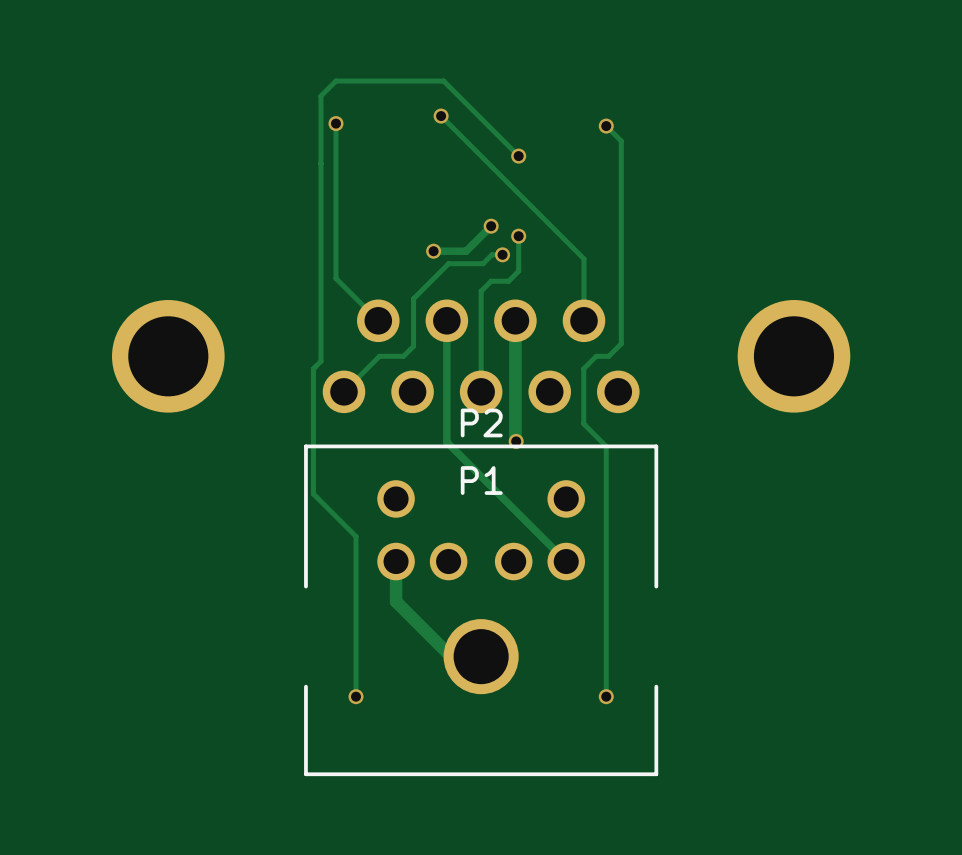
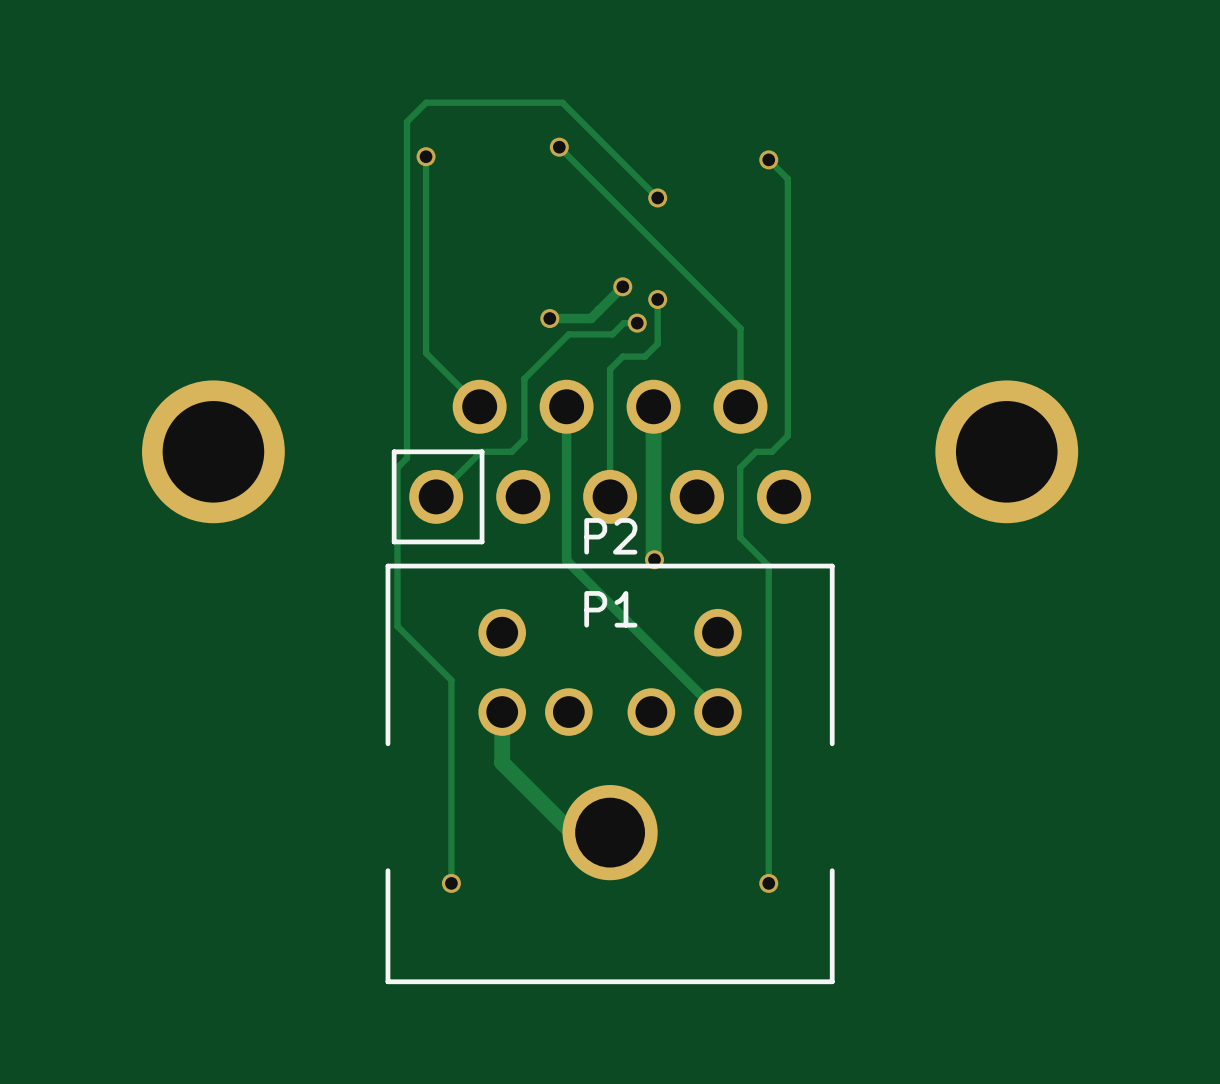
P1 footprint: [112, 299, 851, 414] -> [142, 379, 1079, 545]

